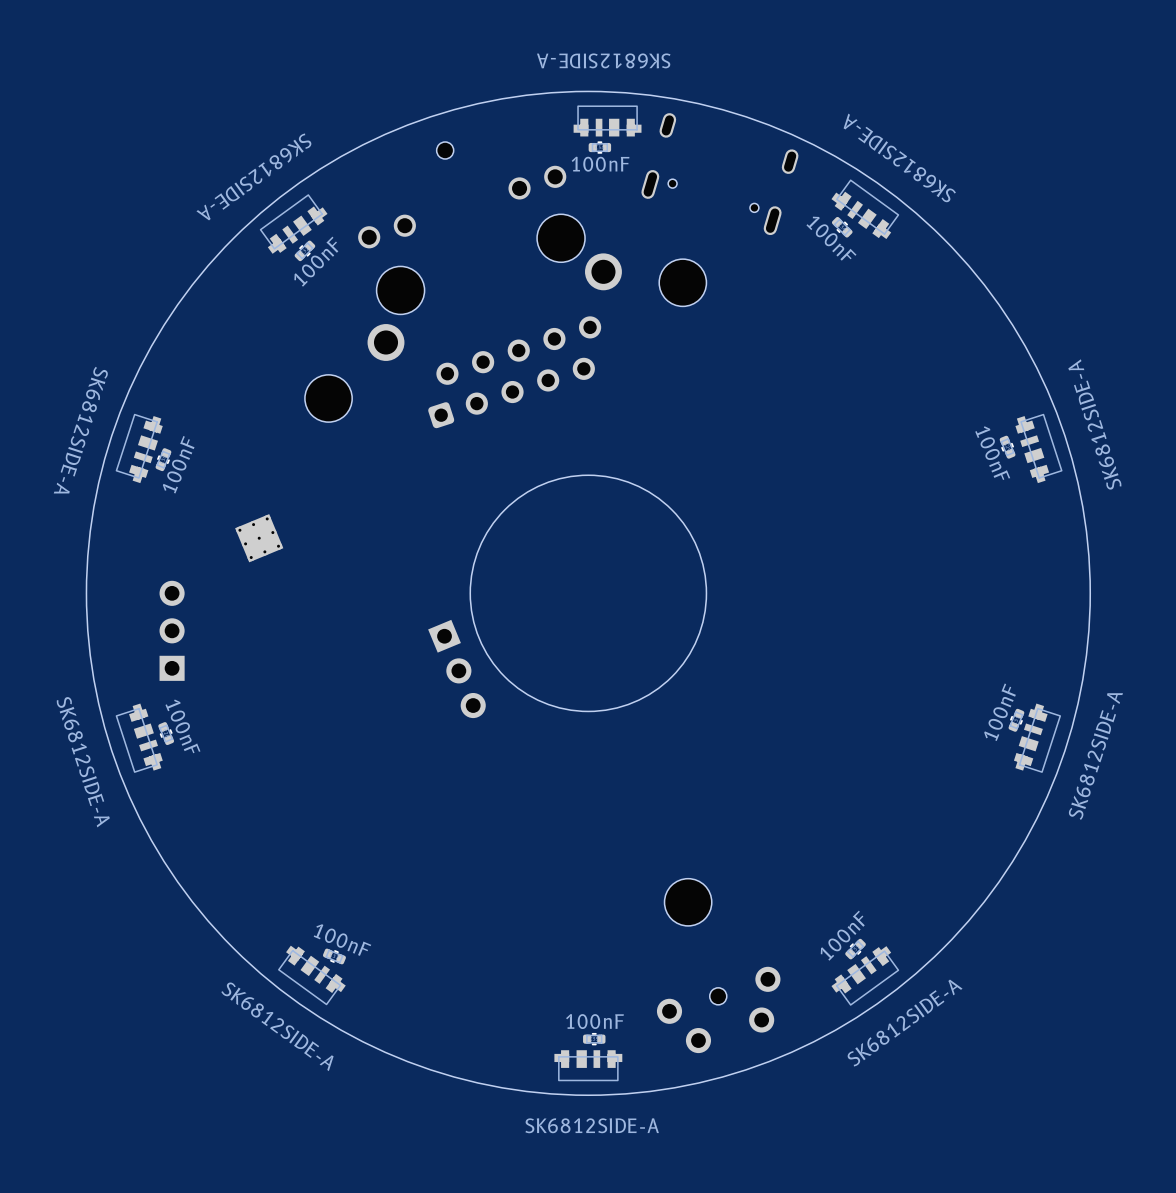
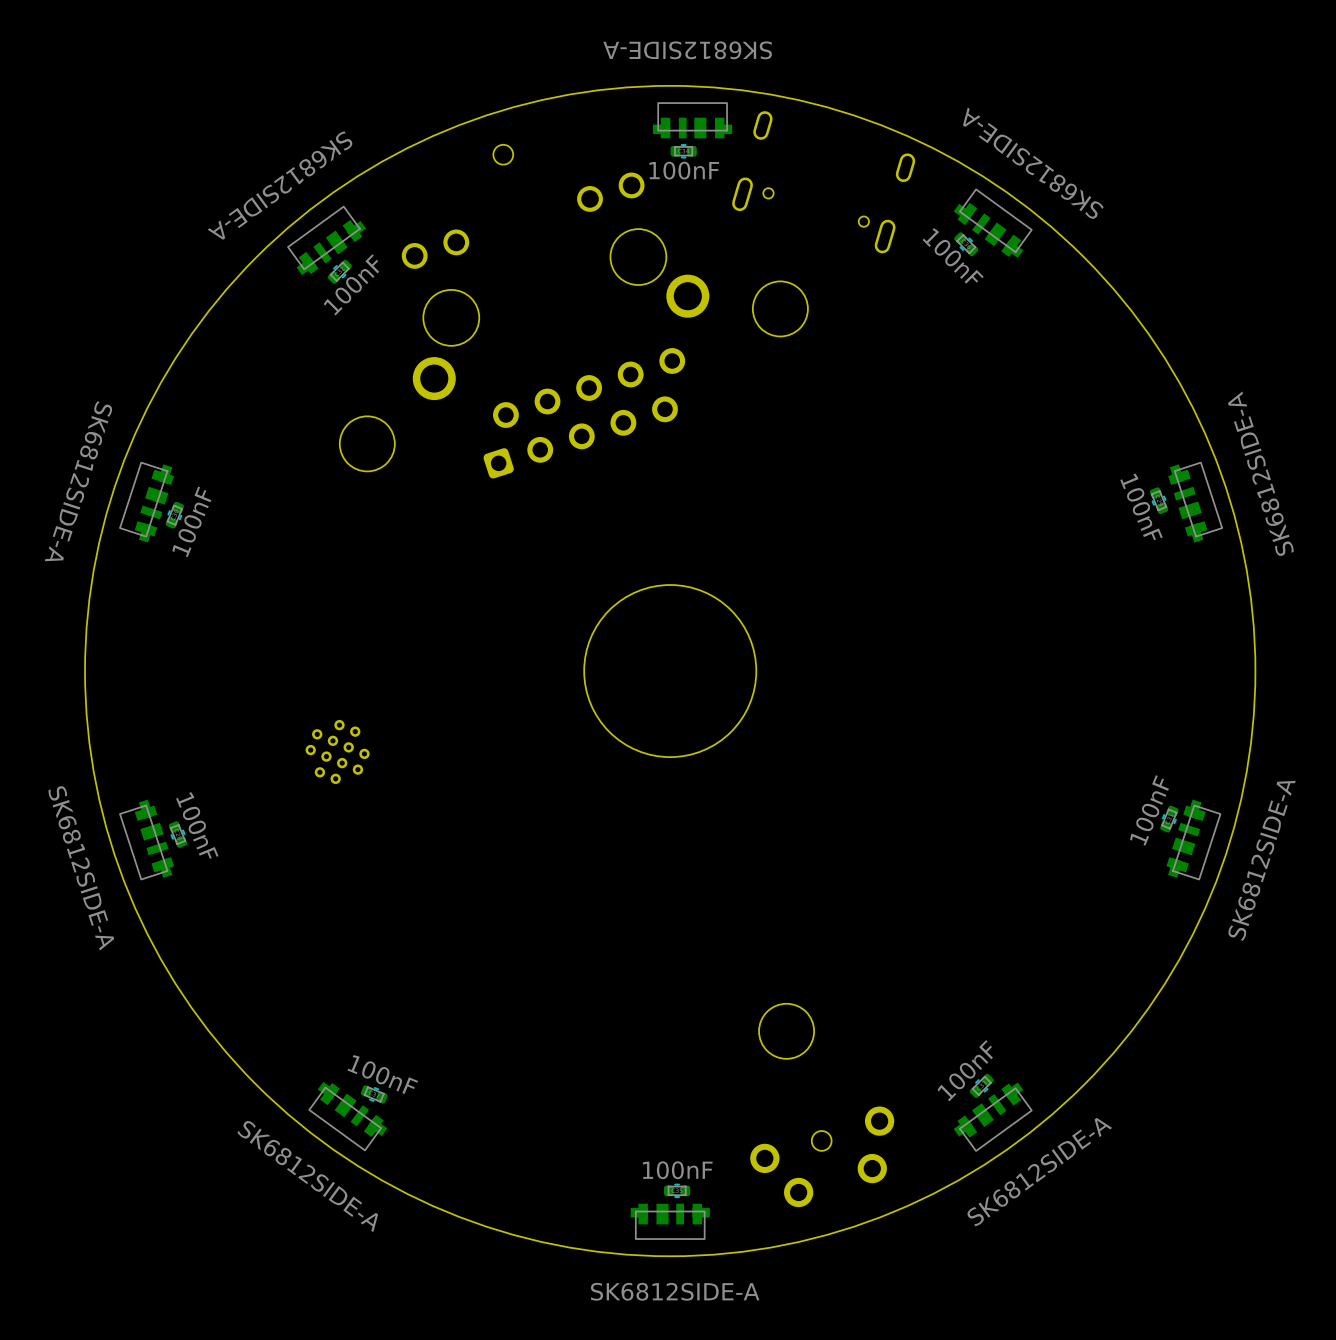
round board edge size: [469, 474, 707, 712] -> [583, 584, 757, 758]
part: (259, 538) -> none
part: (172, 630) -> none
part: none -> (337, 751)
part: (456, 668) -> none

